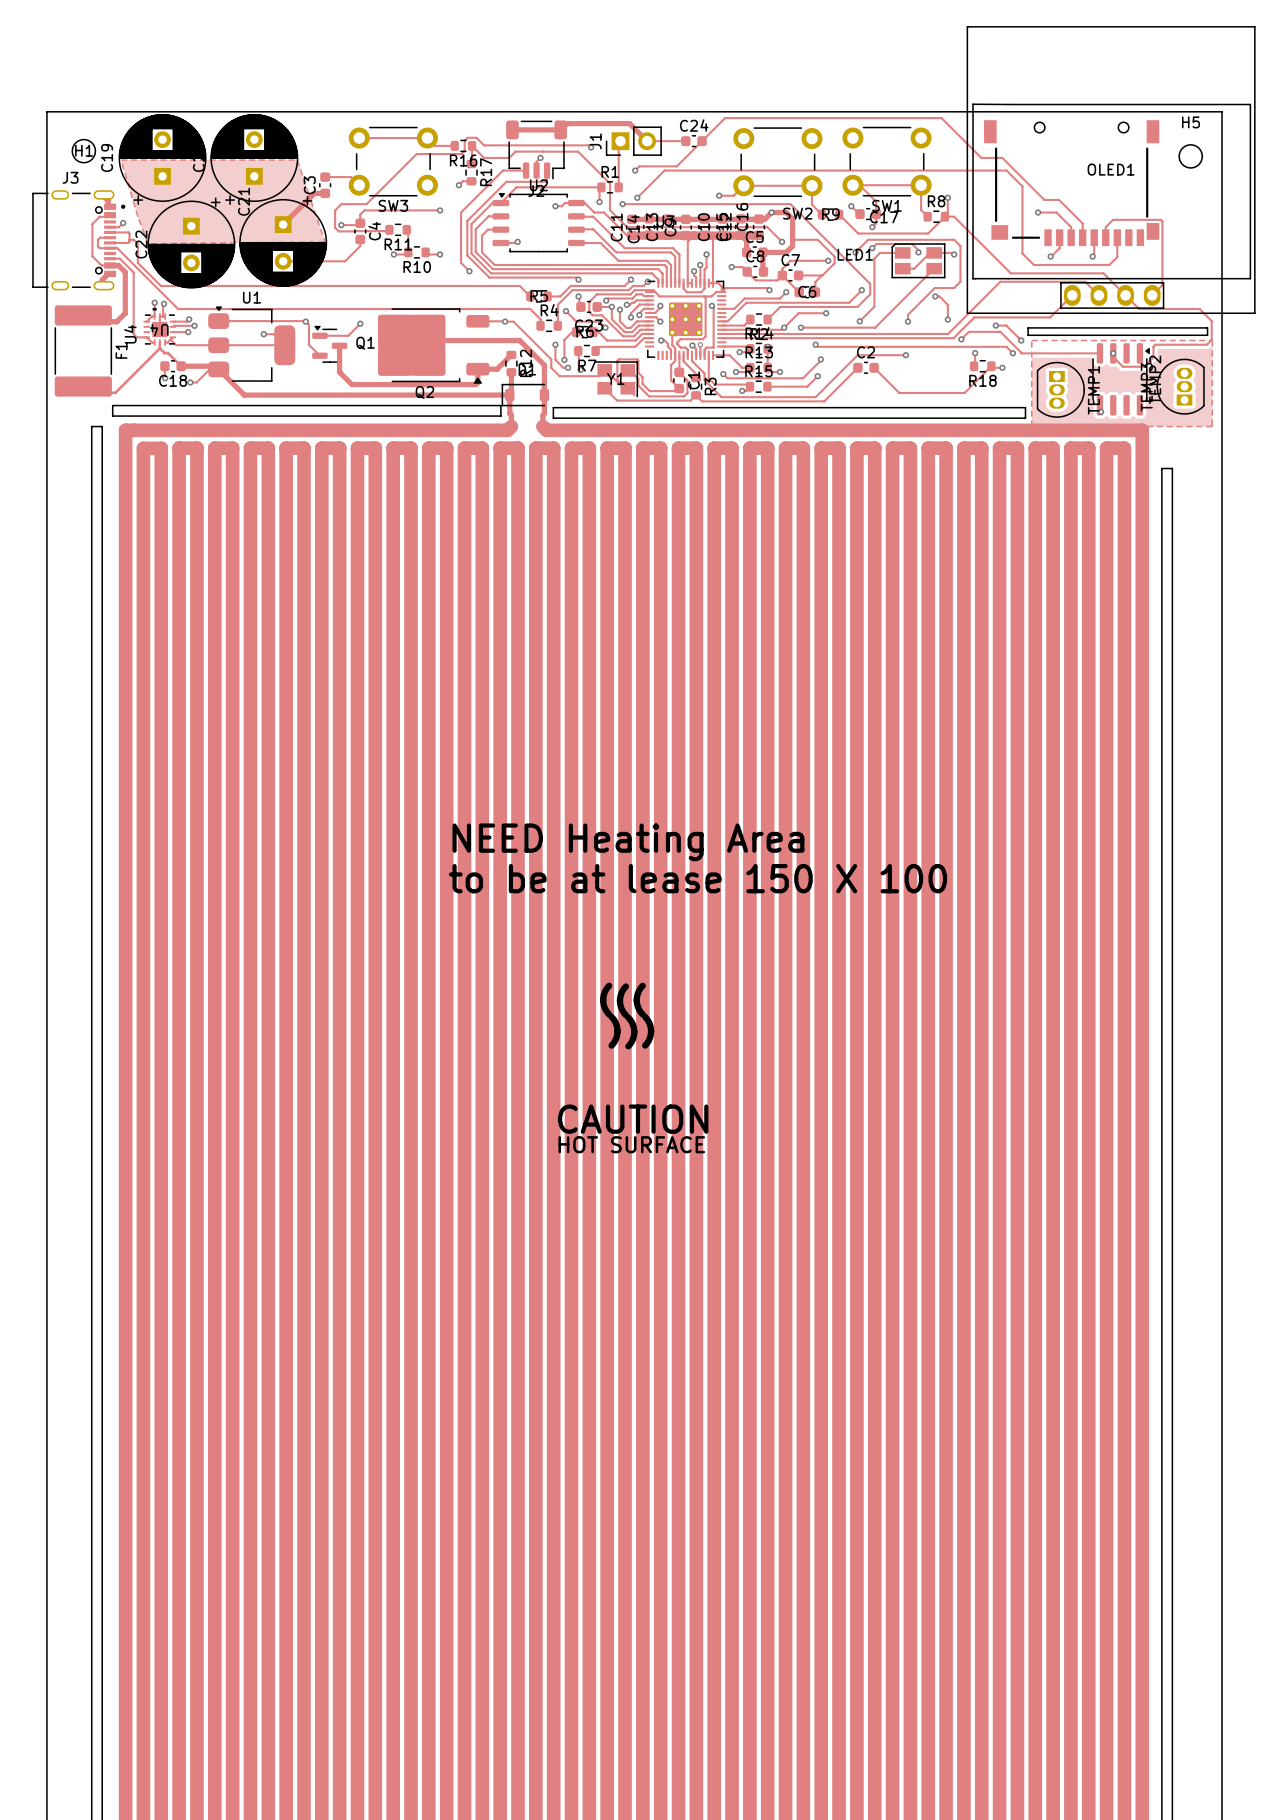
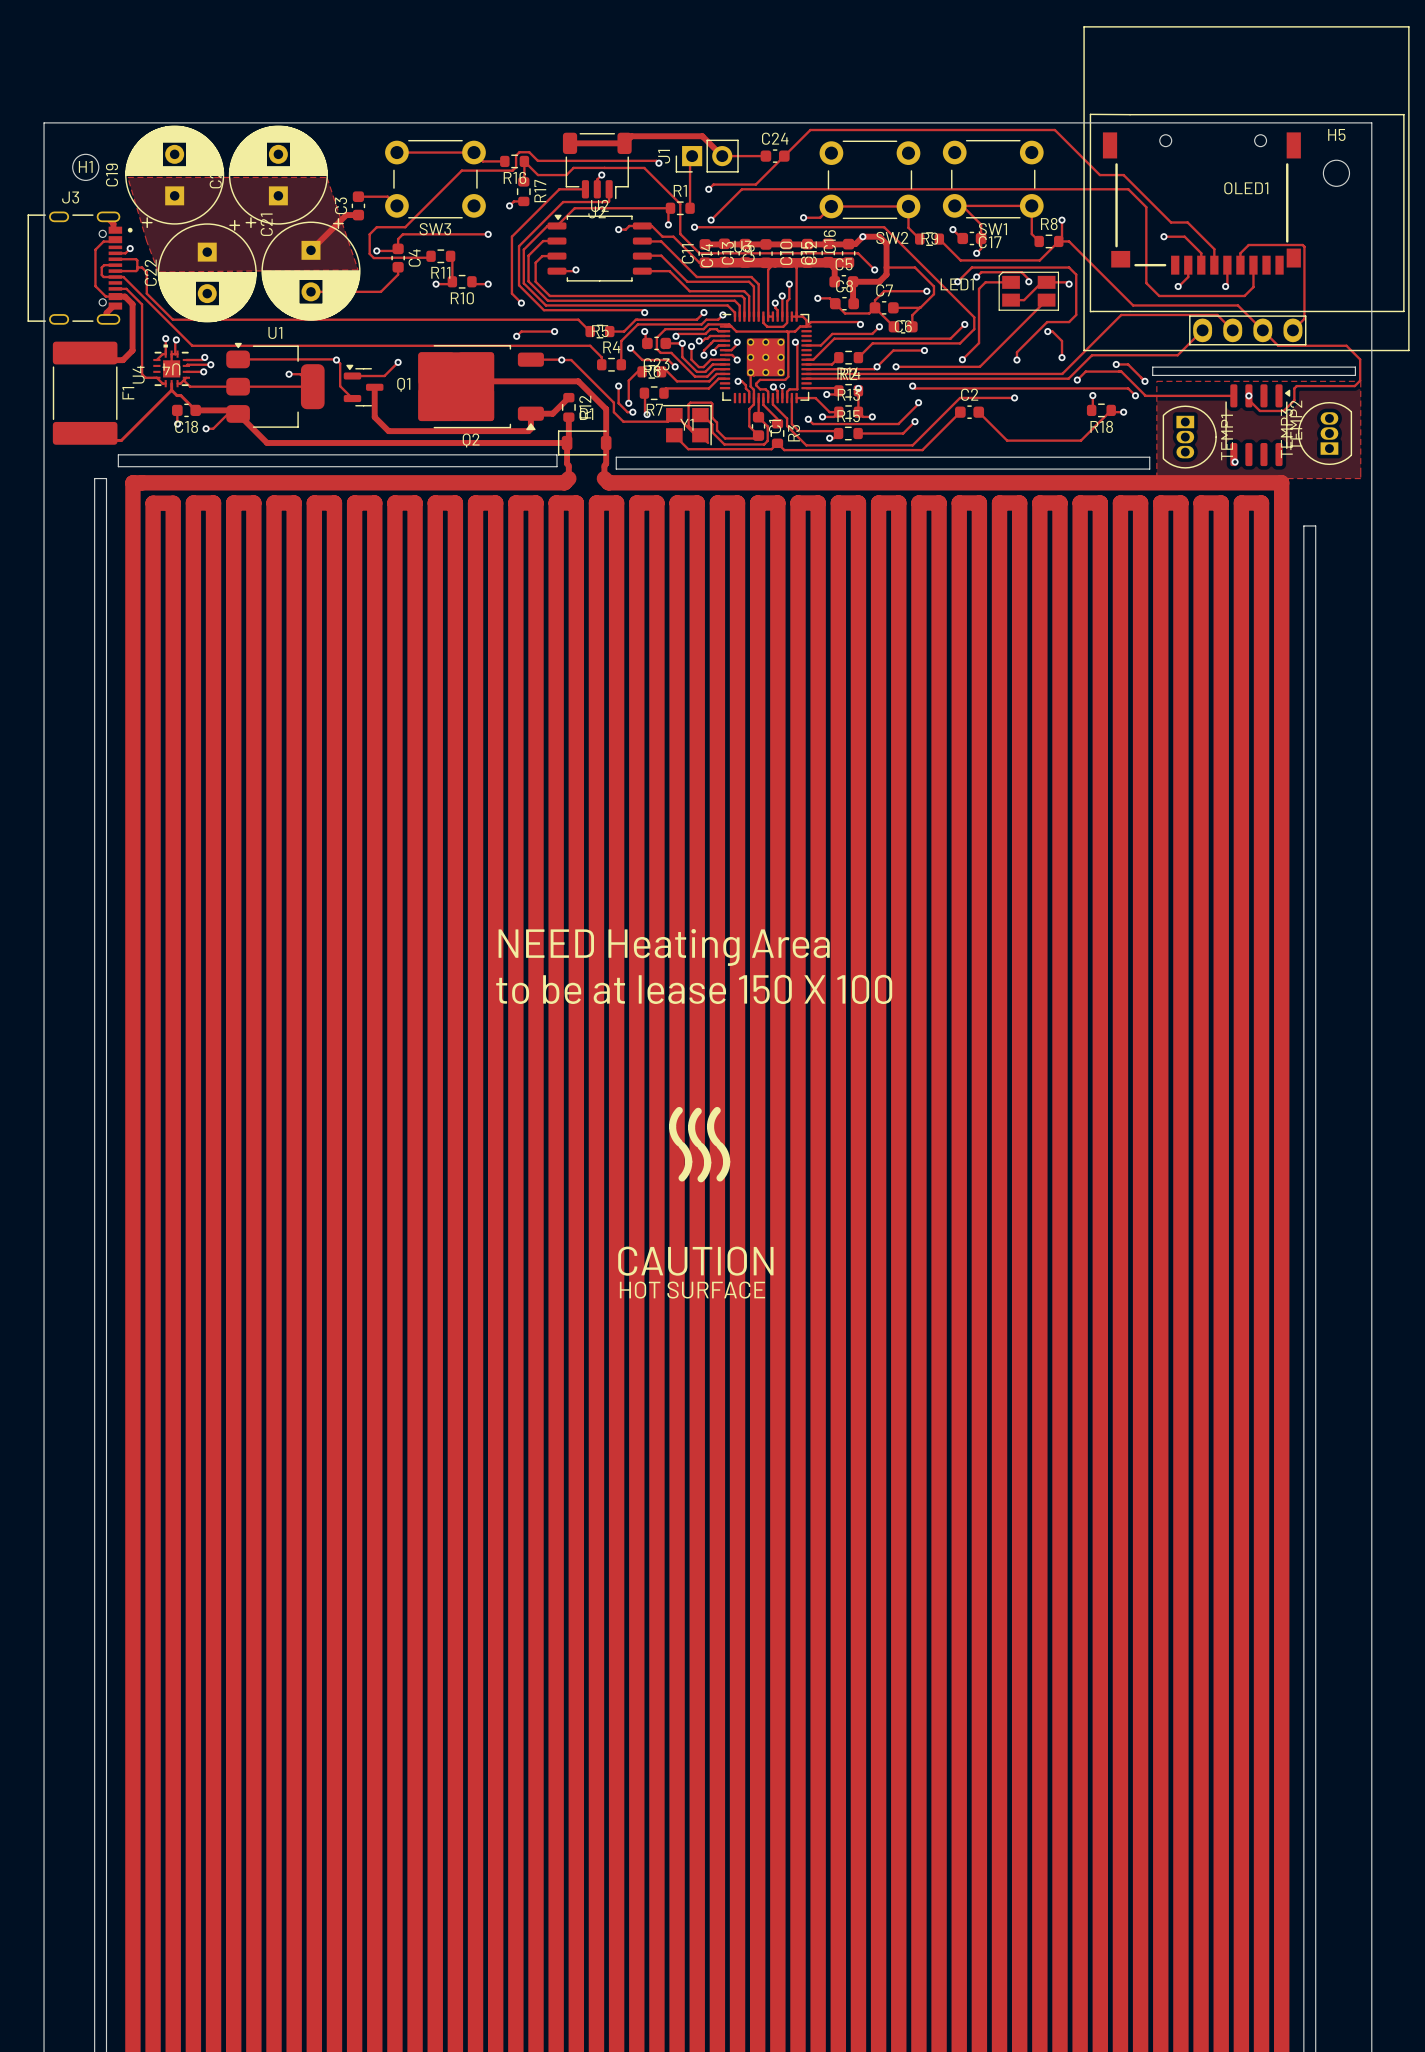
track: none -> (554, 331) (521, 331) (516, 336)
via: none -> (554, 331)
via: none -> (516, 336)

